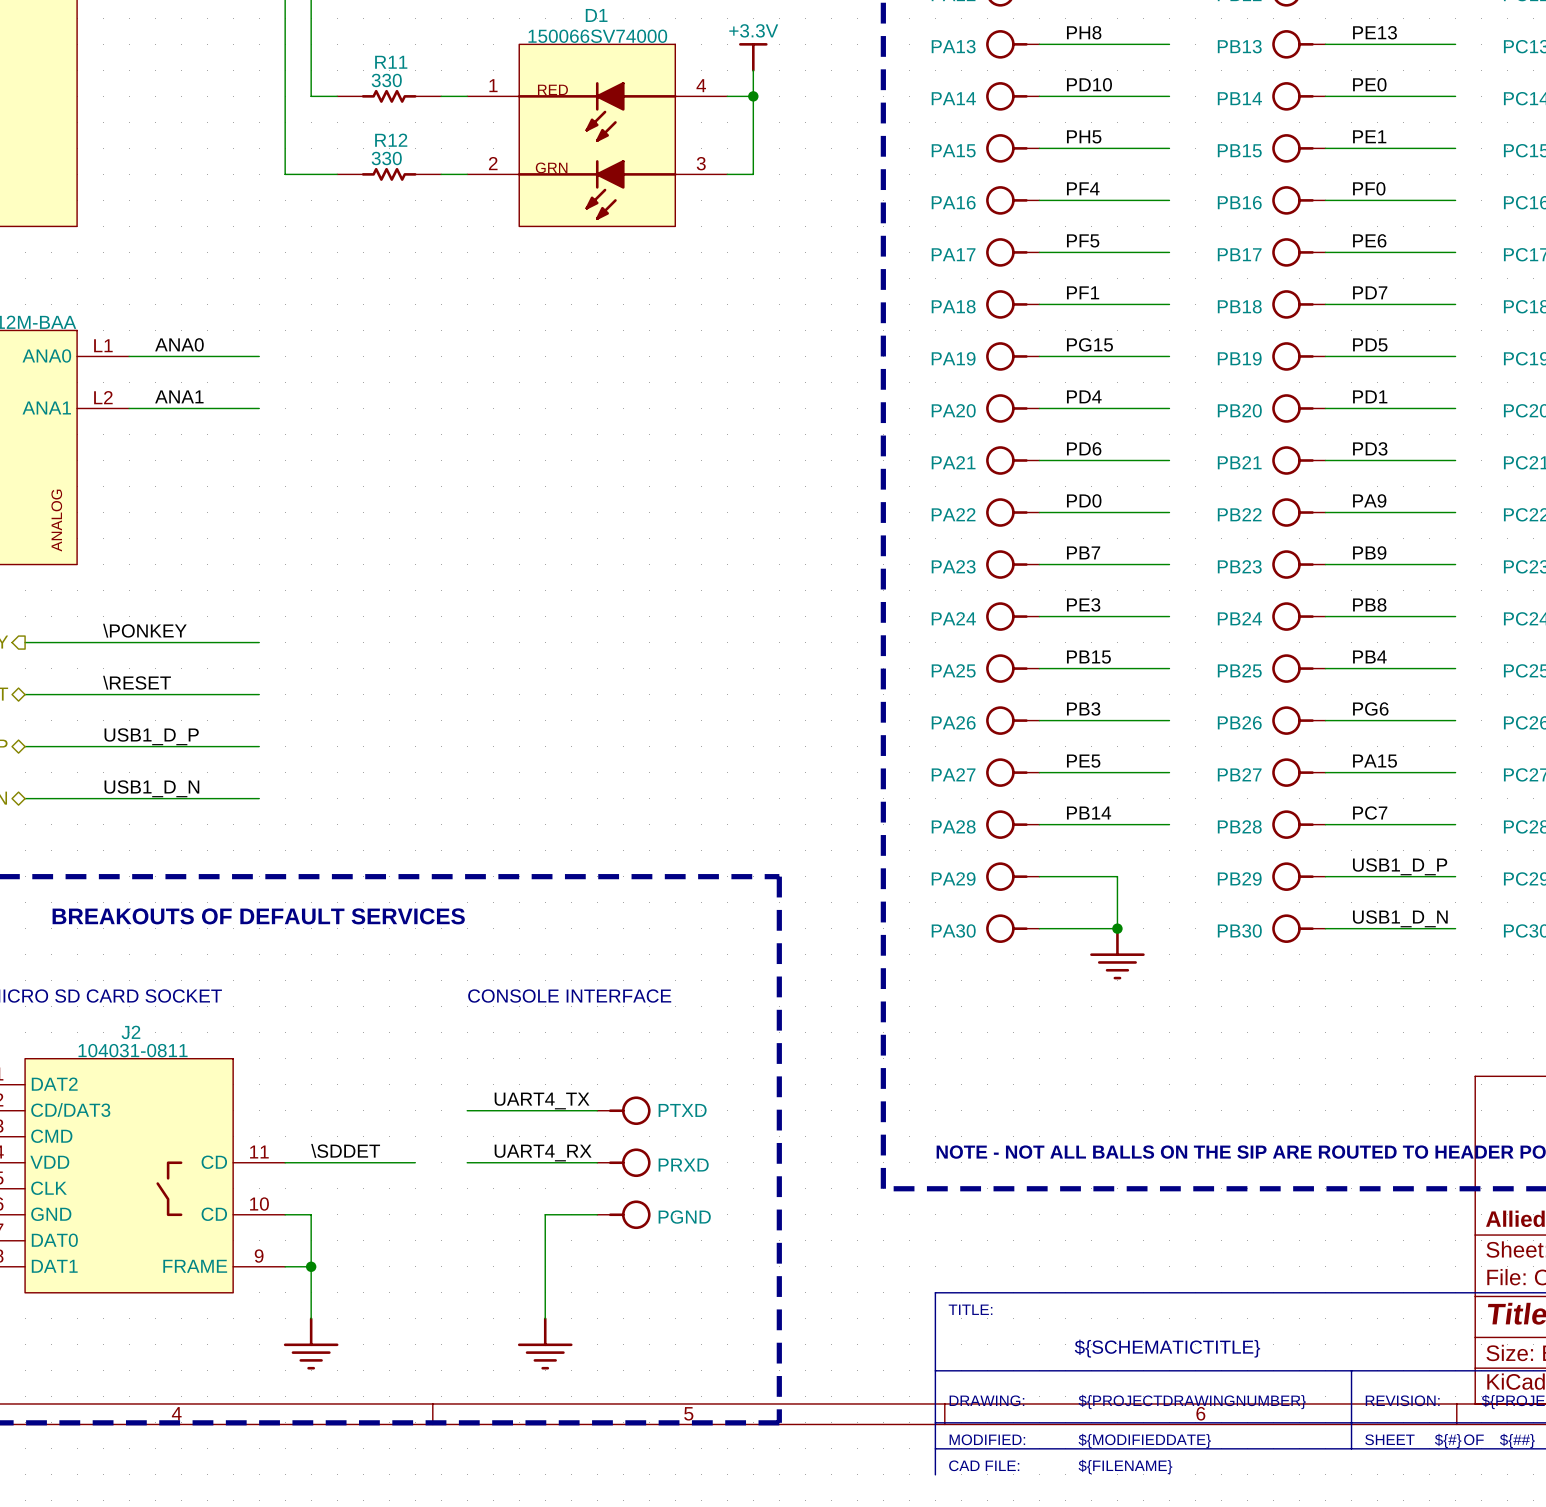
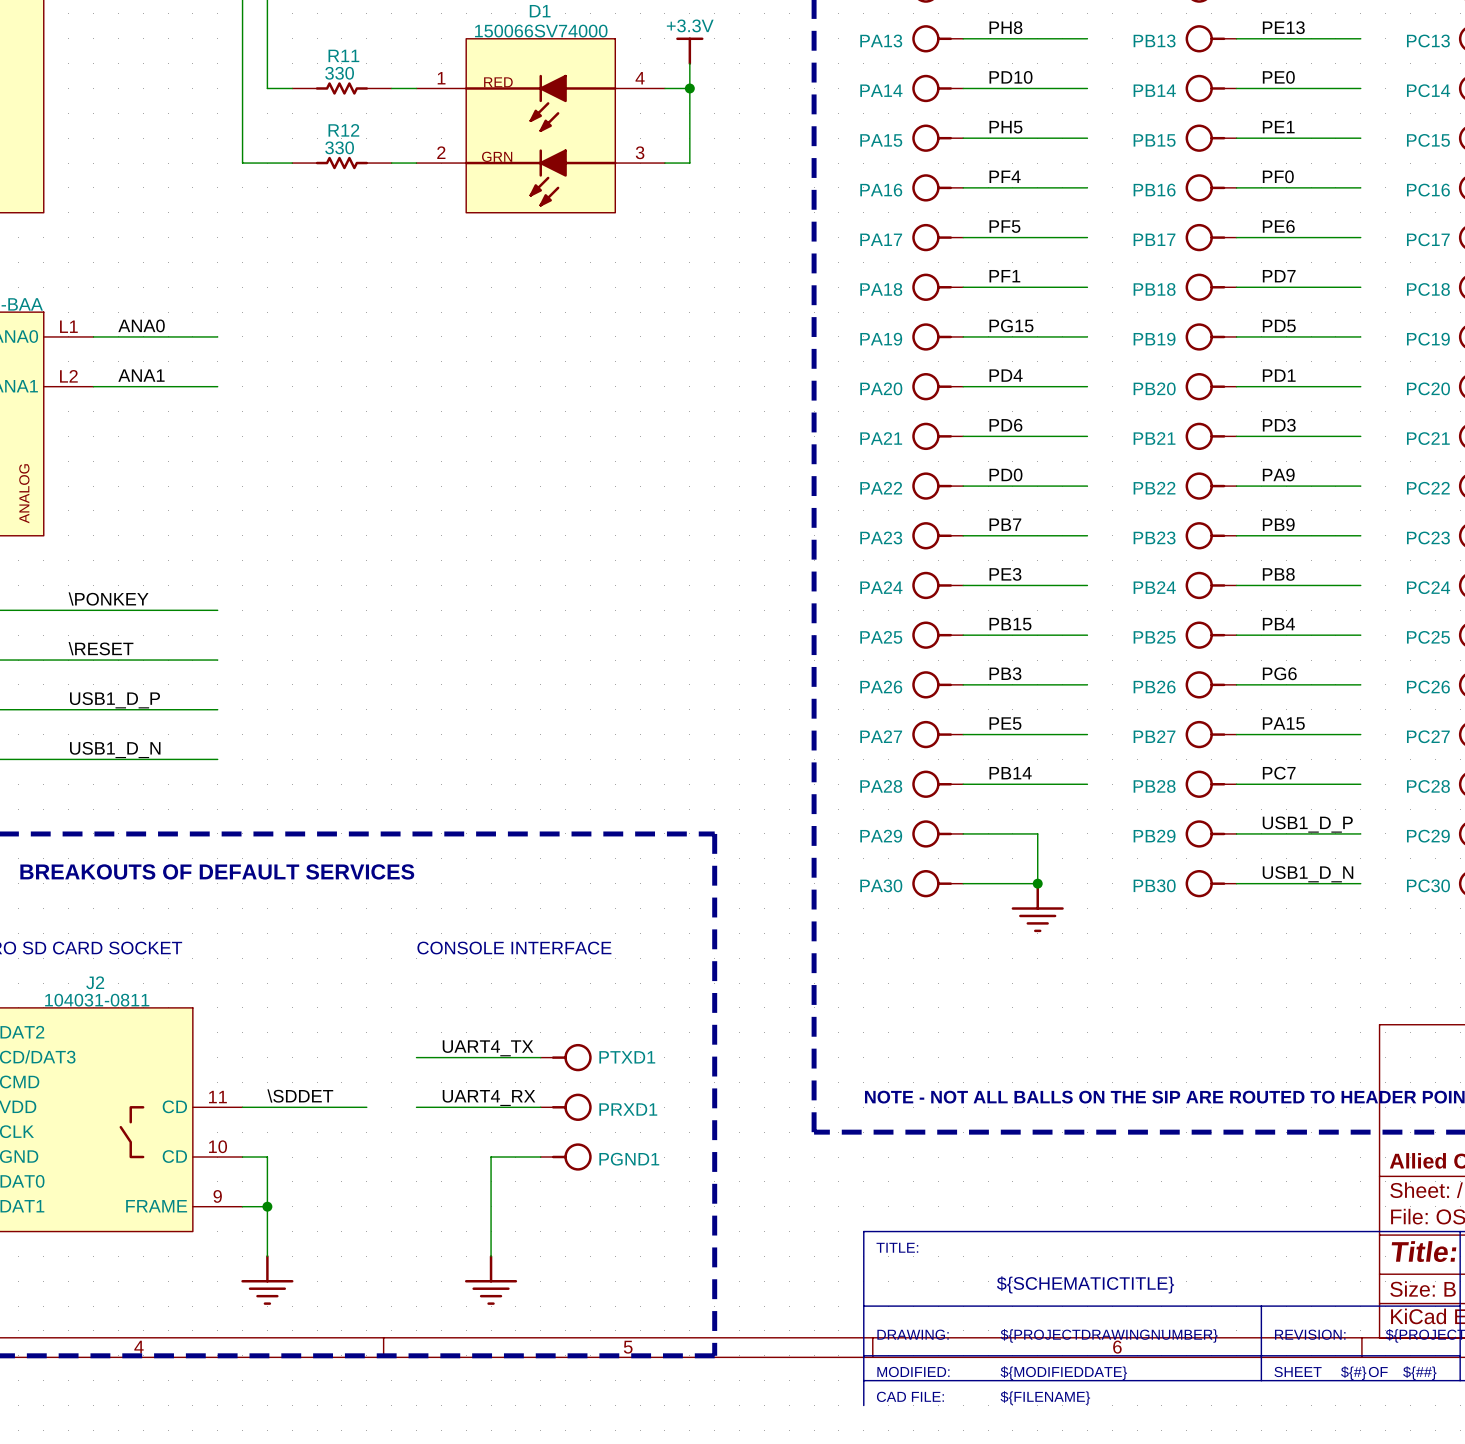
PTXD name: PTXD (682, 1110) -> PTXD1 (627, 1057)
PRXD name: PRXD (683, 1165) -> PRXD1 (628, 1109)
PGND name: PGND (684, 1217) -> PGND1 (629, 1159)

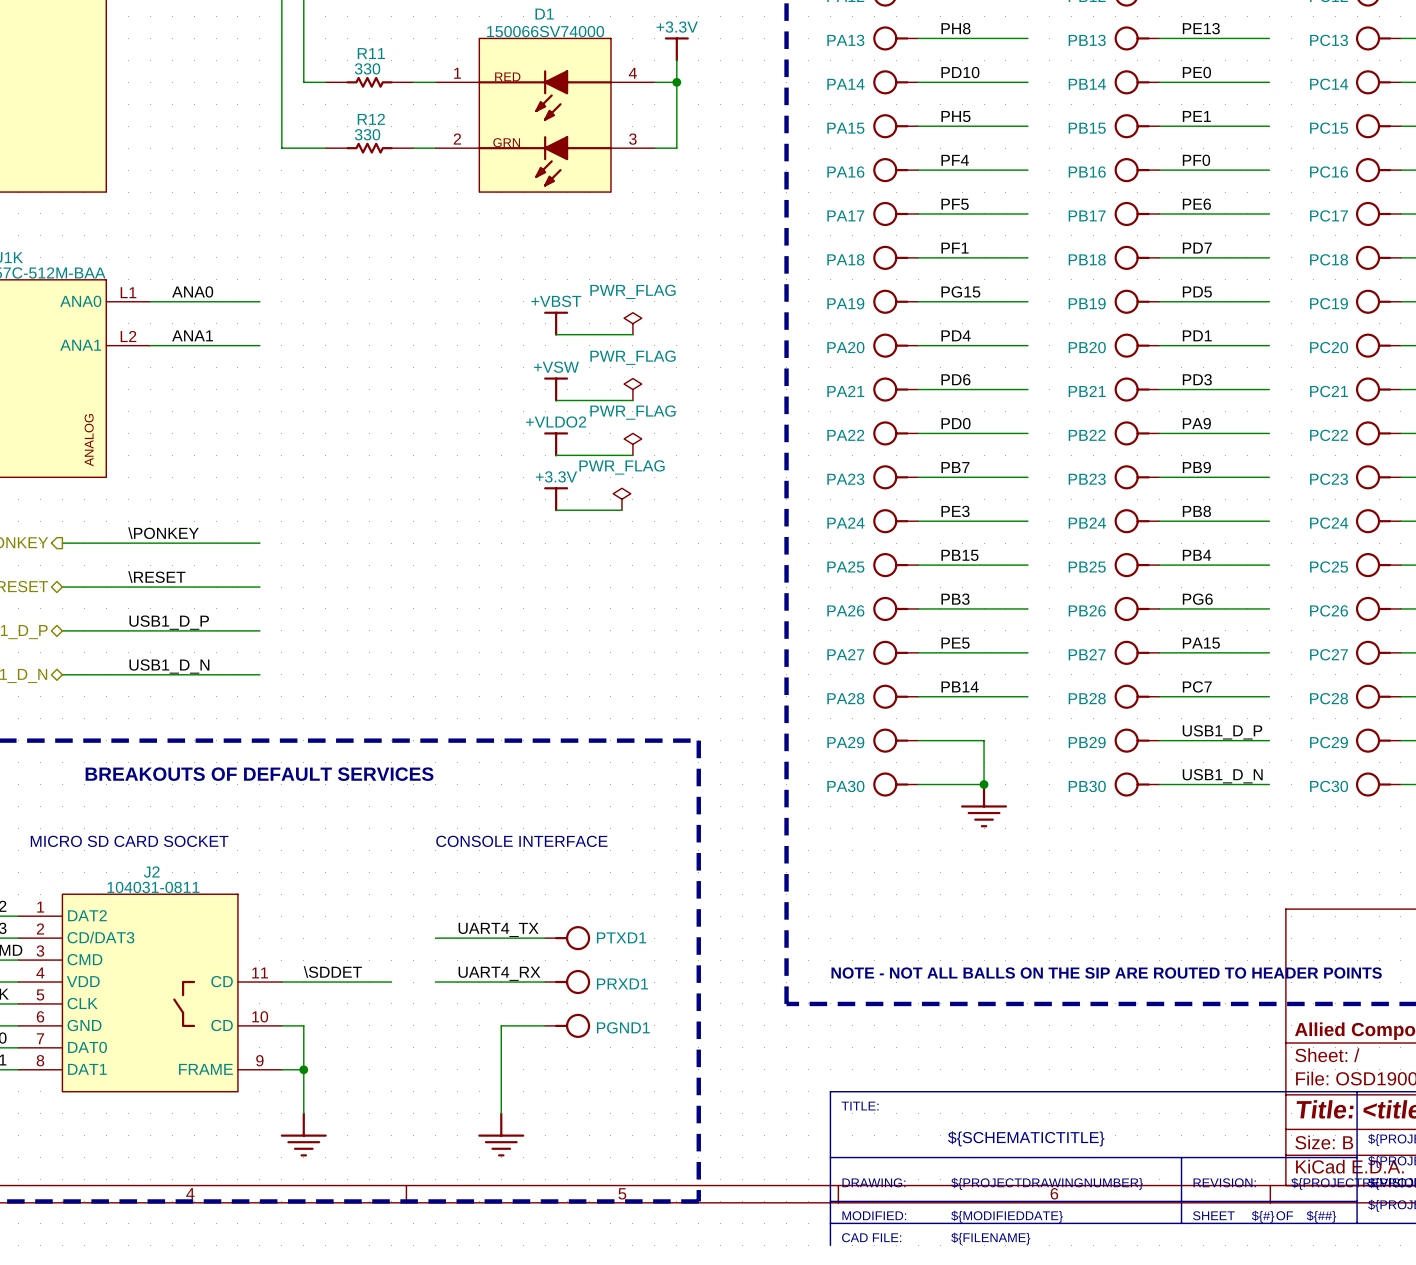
power symbol: none -> +VBST (556, 323)
power symbol: none -> PWR_FLAG (632, 323)
wire: none -> (556, 334) (632, 334)
power symbol: none -> +VSW (556, 389)
power symbol: none -> PWR_FLAG (632, 389)
wire: none -> (556, 400) (632, 400)
power symbol: none -> +VLDO2 (556, 444)
power symbol: none -> PWR_FLAG (632, 444)
wire: none -> (556, 455) (632, 455)
power symbol: none -> +3.3V (556, 499)
power symbol: none -> PWR_FLAG (621, 499)
wire: none -> (556, 510) (621, 510)

